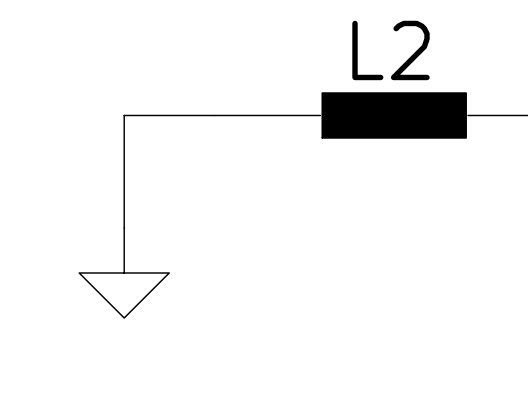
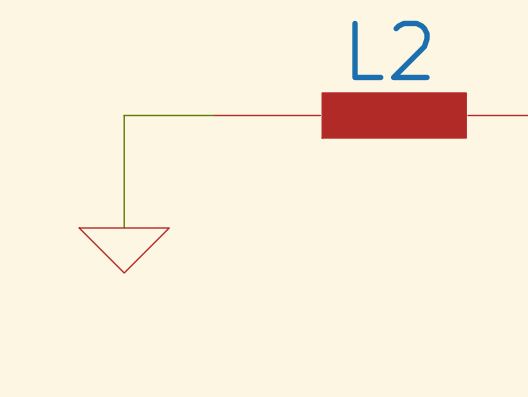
power symbol shape: [79, 227, 170, 318] -> [79, 227, 170, 273]

